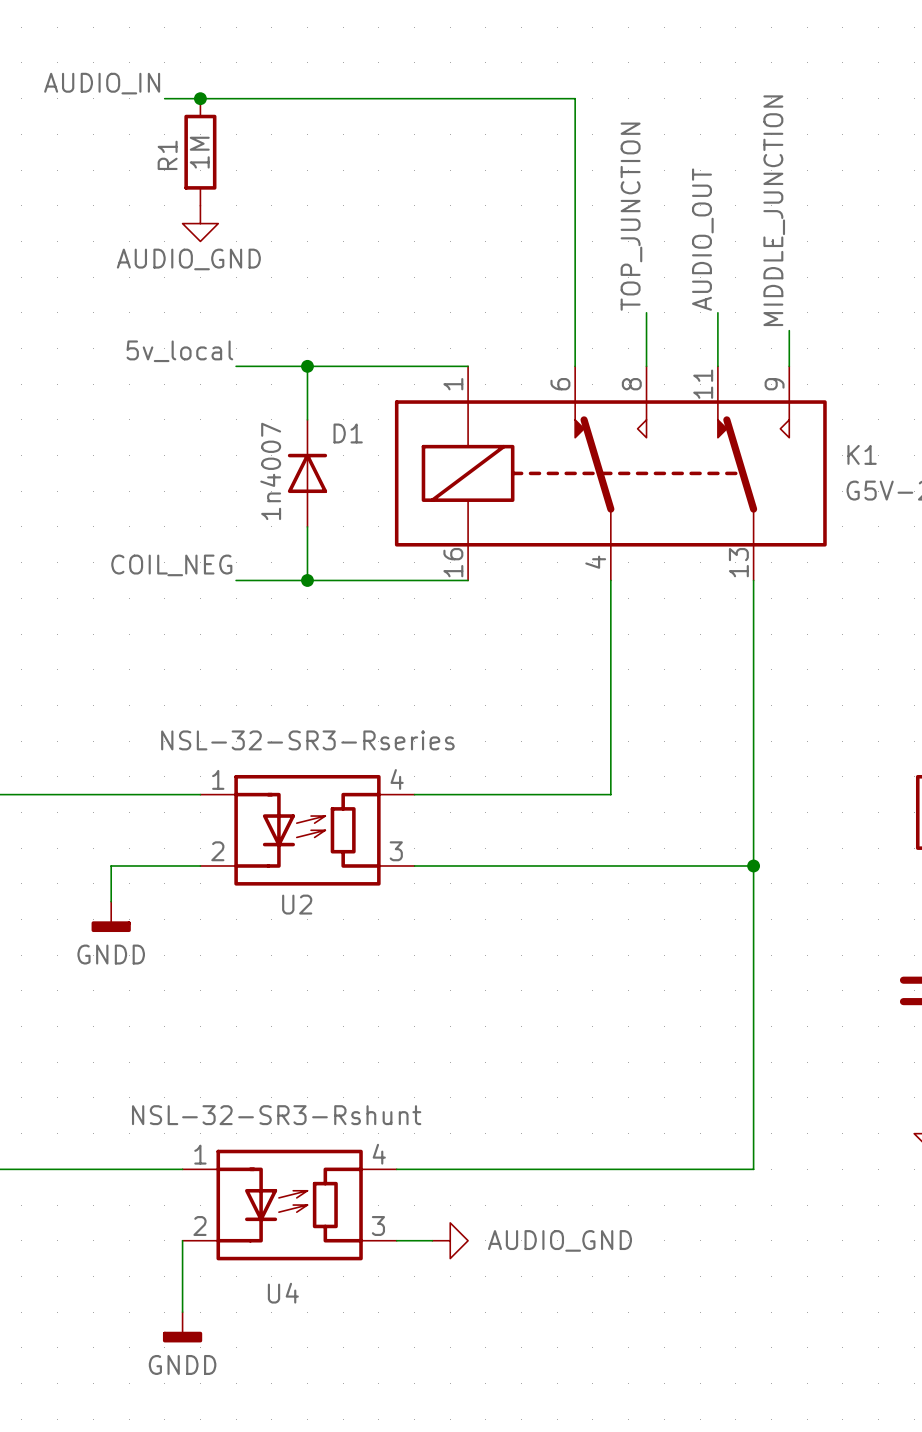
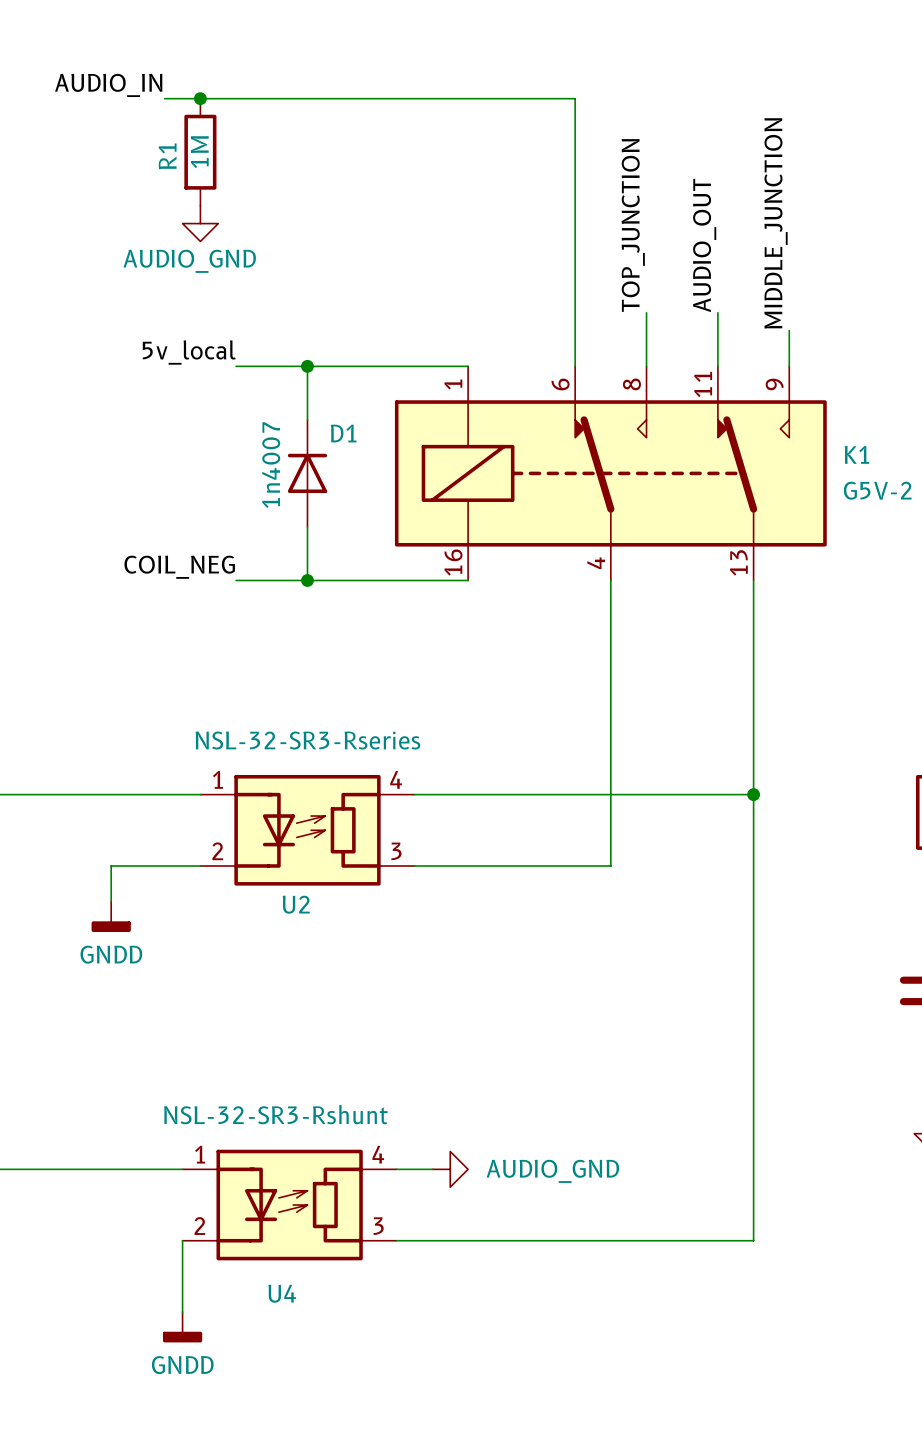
wire: (610, 865) (753, 865) -> (610, 865) (610, 794) (753, 794)
junction position: (753, 865) -> (753, 794)
wire: (432, 1169) (753, 1169) -> (432, 1240) (753, 1240) (753, 1169)
power symbol position: AUDIO_GND (450, 1240) -> AUDIO_GND (450, 1169)

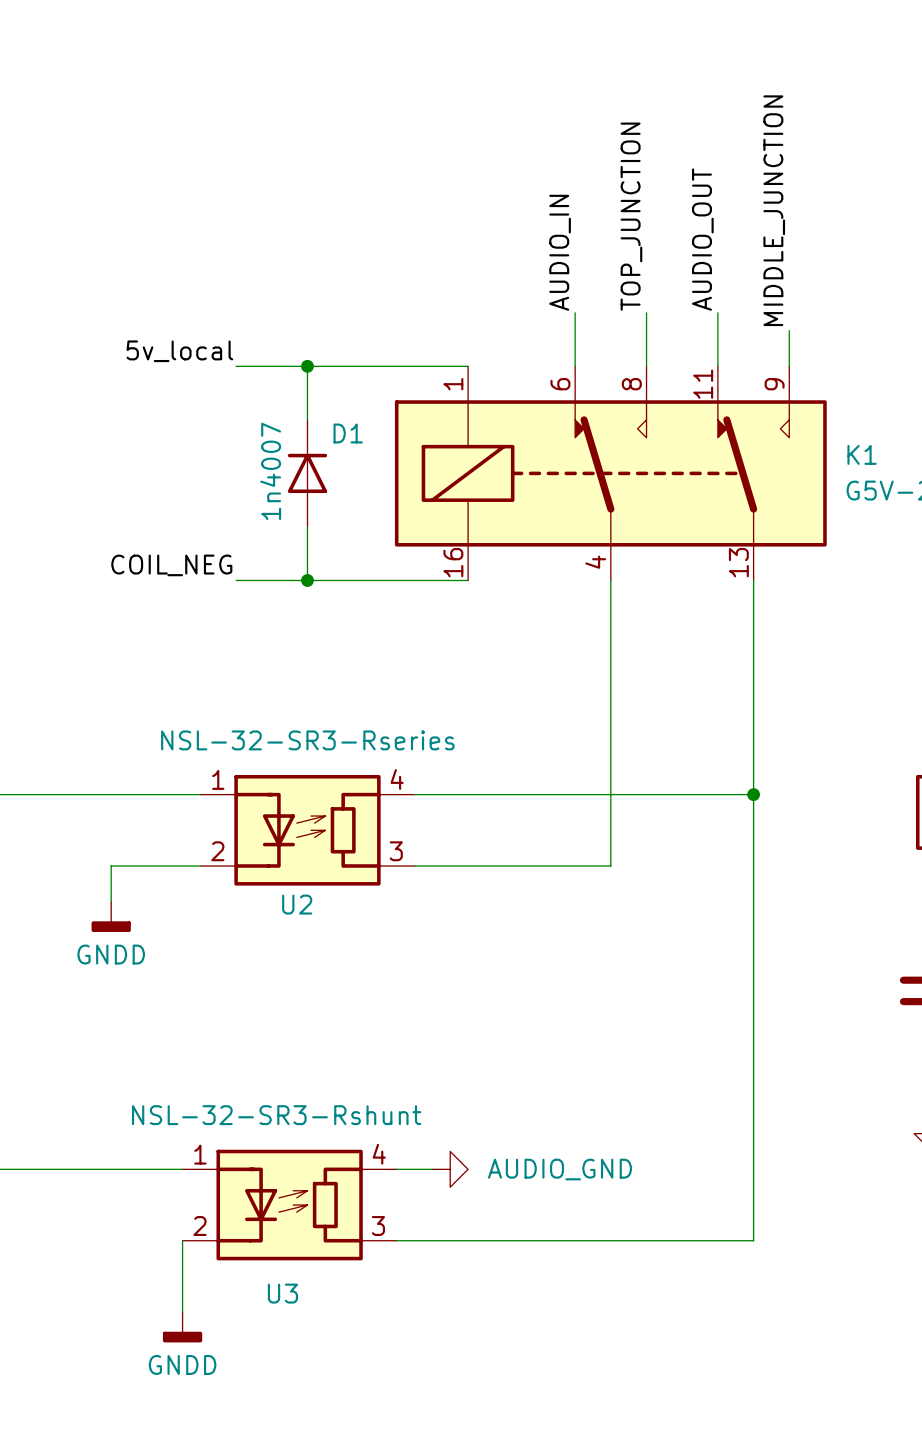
label: AUDIO_IN (108, 85) -> none
wire: (164, 98) (575, 98) (575, 312) -> none
junction: (200, 98) -> none
R1: 1M (200, 152) -> none
power symbol: AUDIO_GND (200, 223) -> none
label: none -> AUDIO_IN (560, 252)
U4 name: U4 (282, 1293) -> U3 (282, 1293)

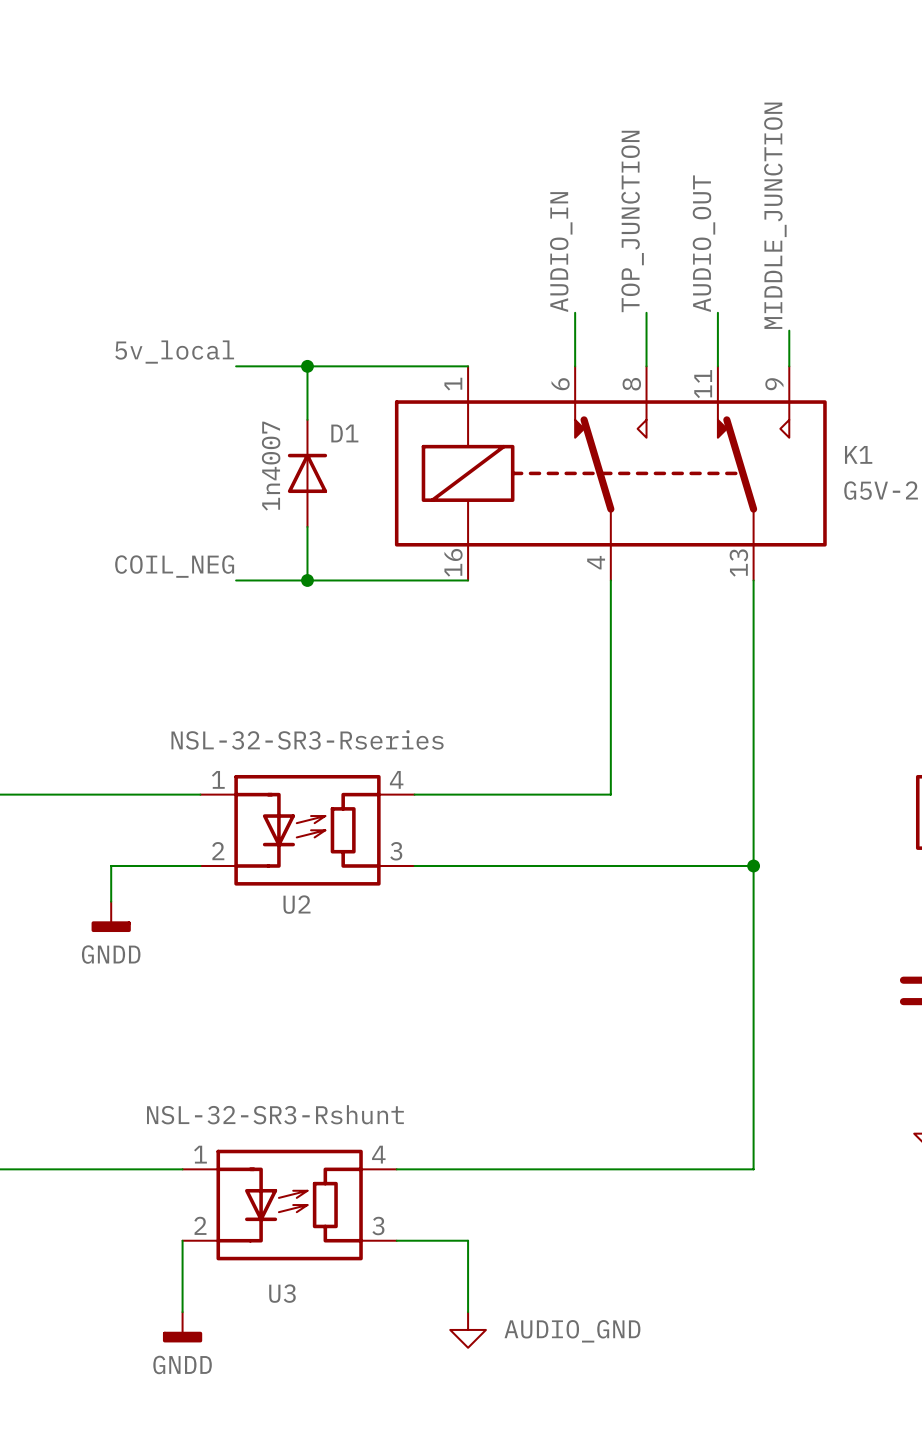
wire: (753, 794) (610, 794) (610, 865) -> (753, 865) (610, 865)
junction position: (753, 794) -> (753, 865)
power symbol rotation: 0° (450, 1169) -> 90° clockwise (468, 1329)
power symbol position: AUDIO_GND (450, 1169) -> AUDIO_GND (468, 1329)
wire: (753, 1169) (753, 1240) (468, 1240) -> (753, 1169) (432, 1169)
wire: none -> (468, 1240) (468, 1312)

